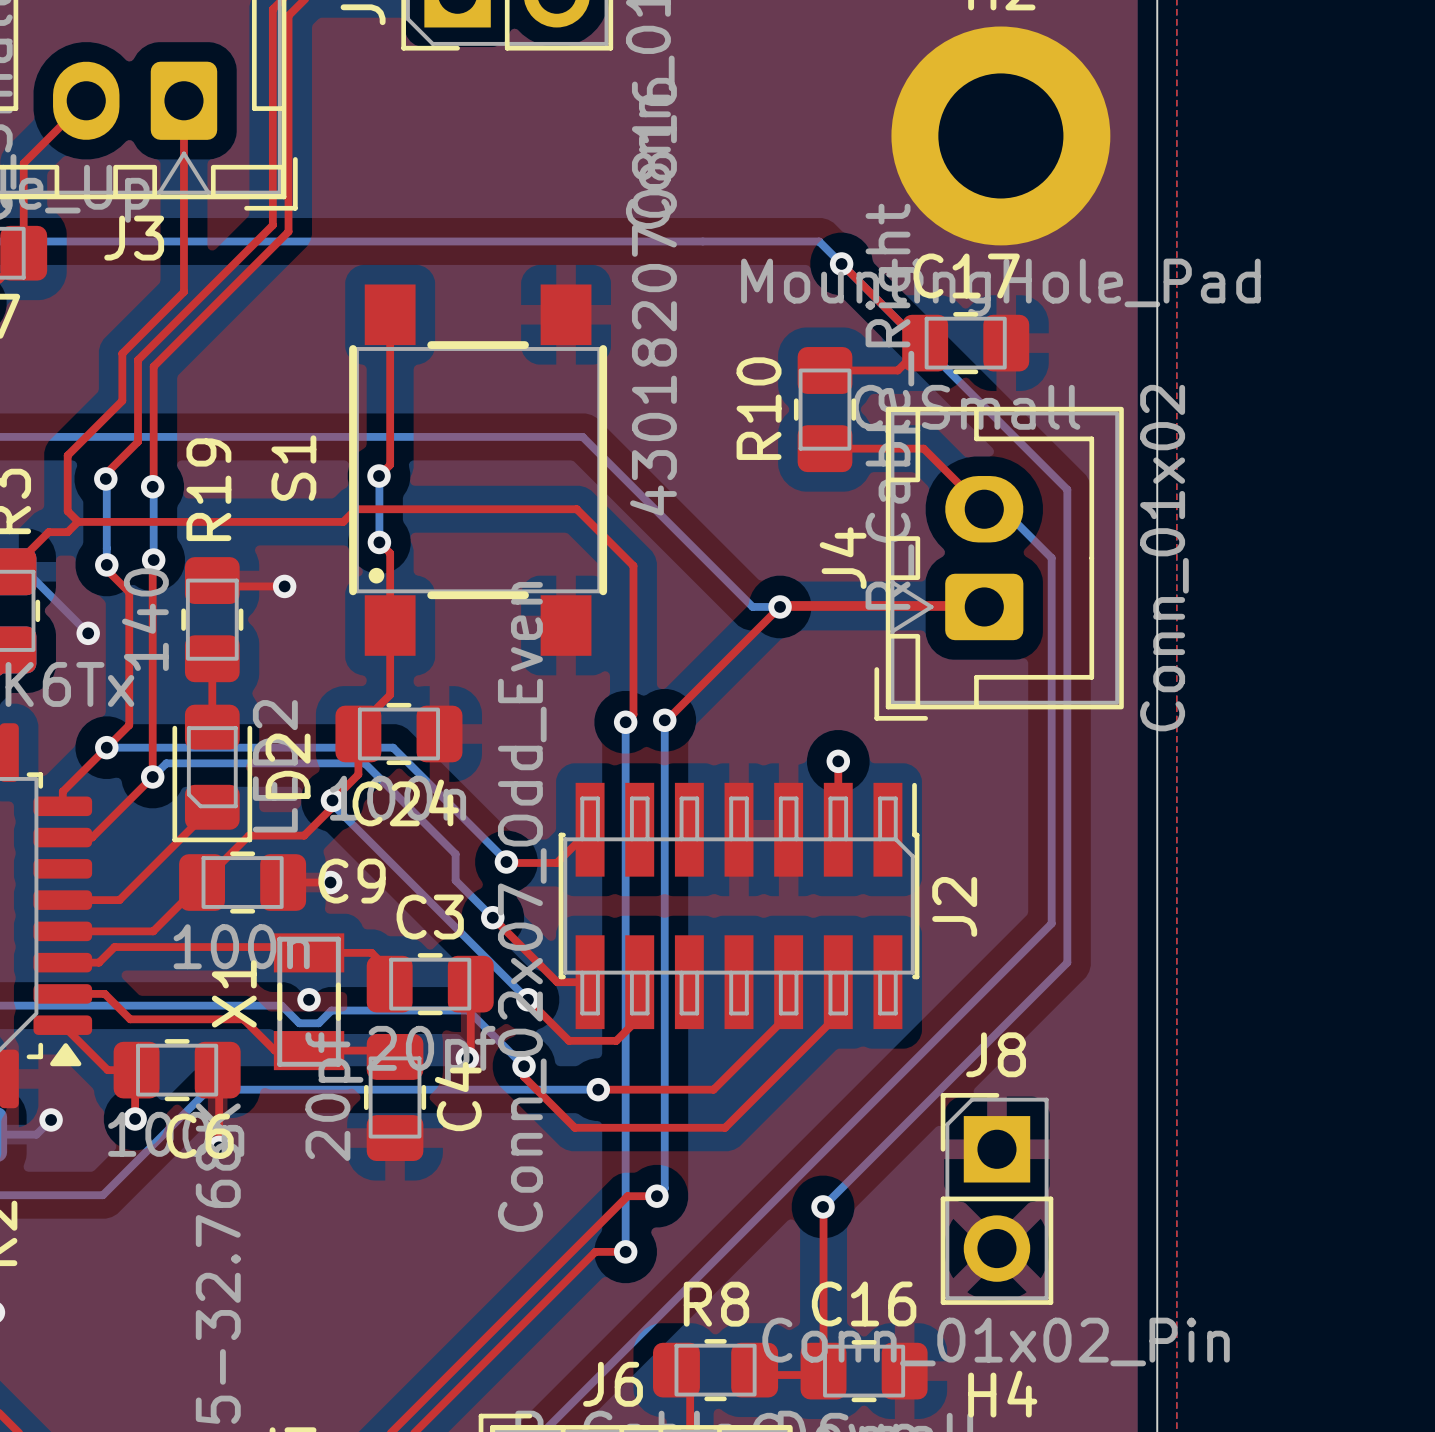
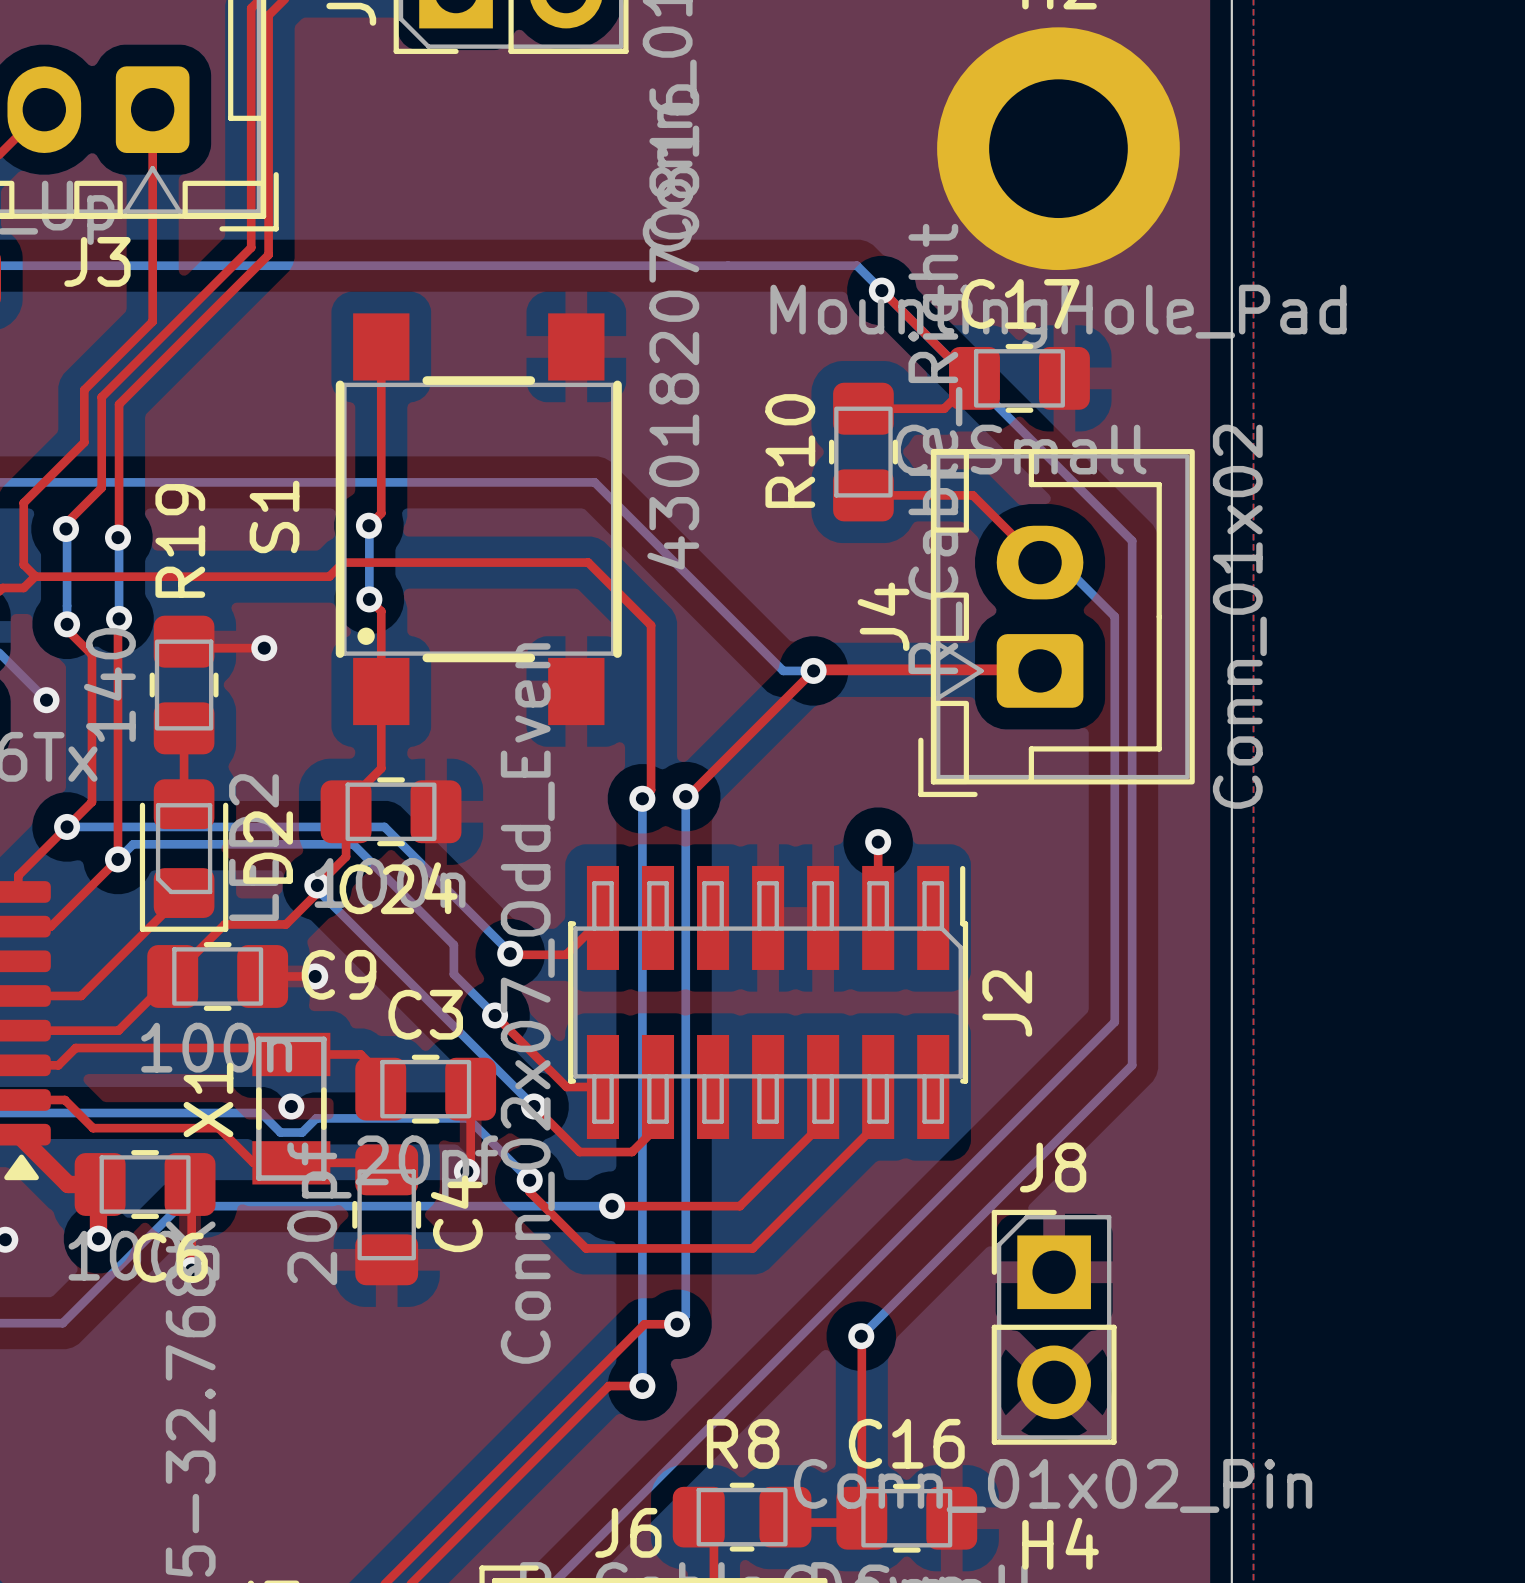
top track width: thin (62, 1025) (107, 1070) (136, 1070) (135, 1118) -> thick (18, 1134) (68, 1184) (100, 1184) (98, 1186) (98, 1238)

